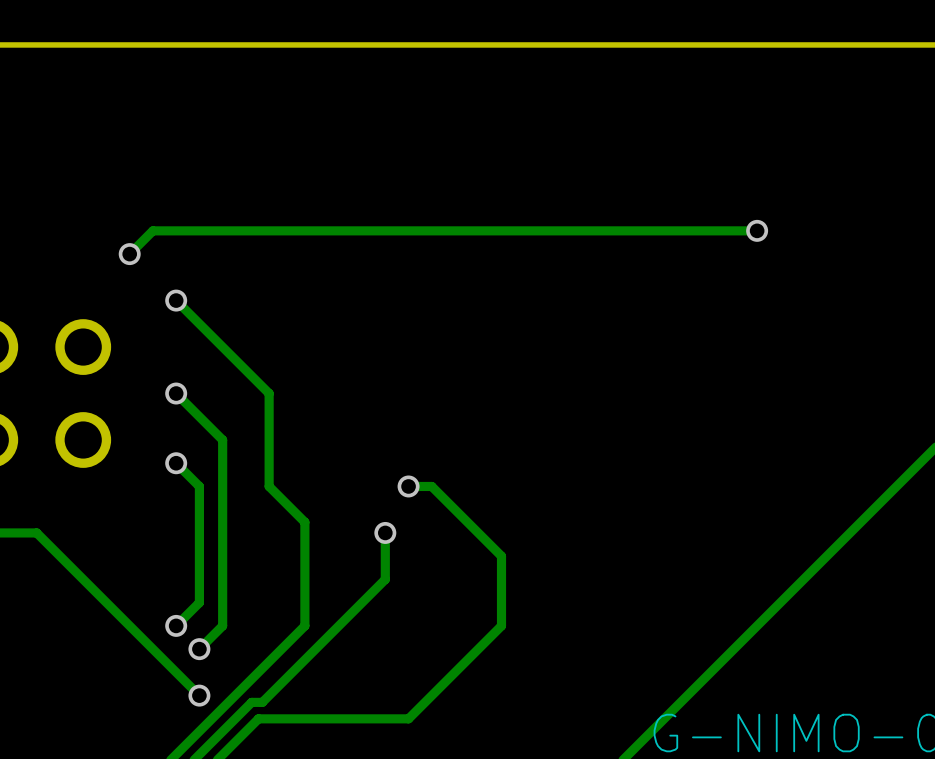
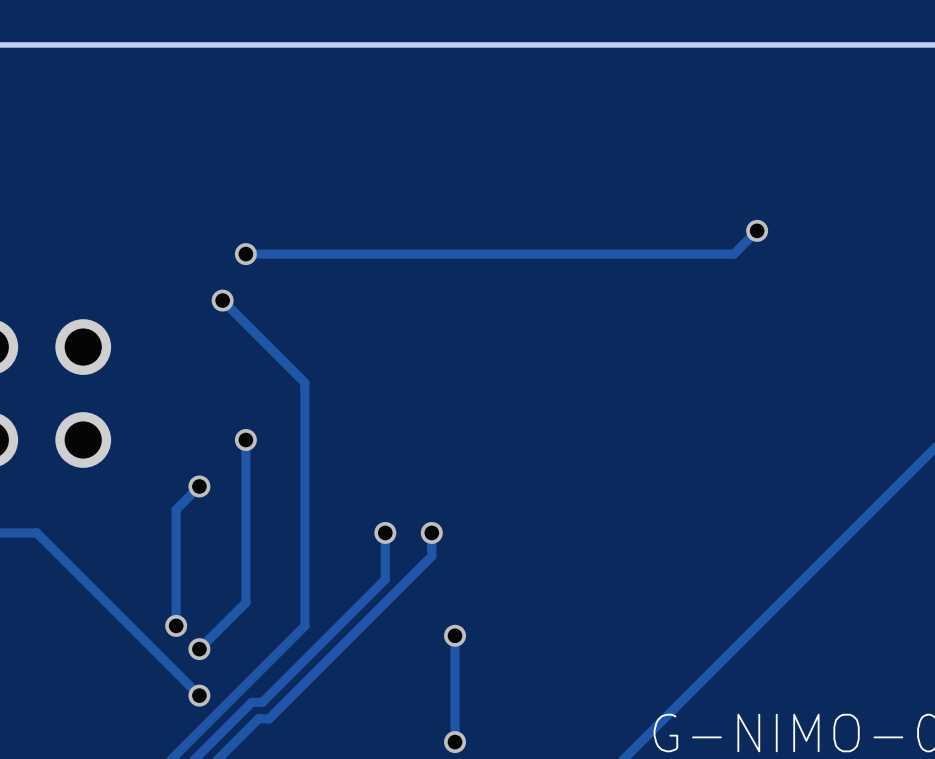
track: (757, 230) (152, 230) (129, 254) -> (757, 230) (733, 254) (245, 254)
via: (129, 254) -> none
via: none -> (245, 254)
track: (176, 300) (269, 393) (269, 486) (304, 522) -> (222, 300) (304, 382) (304, 522)
via: (176, 300) -> none
via: none -> (222, 300)
track: (176, 393) (222, 440) (222, 625) -> (245, 440) (245, 602) (222, 625)
via: (176, 393) -> none
via: none -> (245, 440)
track: (176, 463) (199, 486) (199, 602) (176, 625) -> (199, 486) (176, 509) (176, 625)
via position: (176, 463) -> (199, 486)
track: (408, 486) (431, 486) (501, 556) (501, 625) (408, 718) (269, 718) -> (431, 532) (431, 556) (269, 718)
via position: (408, 486) -> (431, 532)
track: none -> (455, 635) (455, 742)
via: none -> (455, 635)
via: none -> (455, 742)

